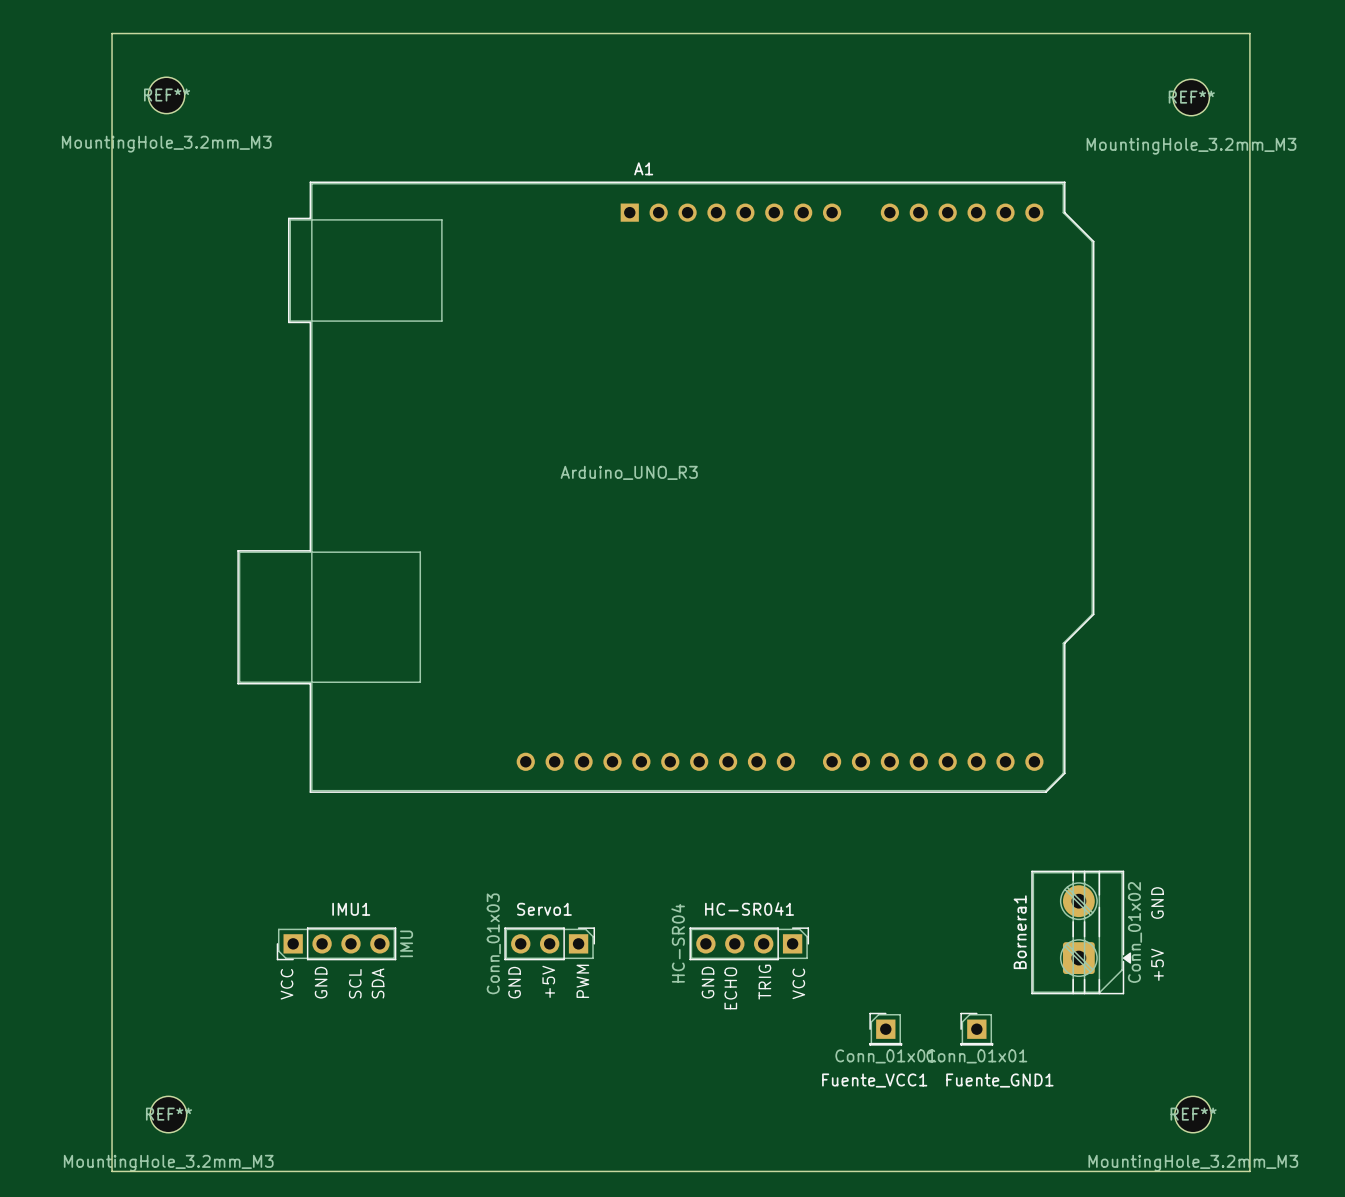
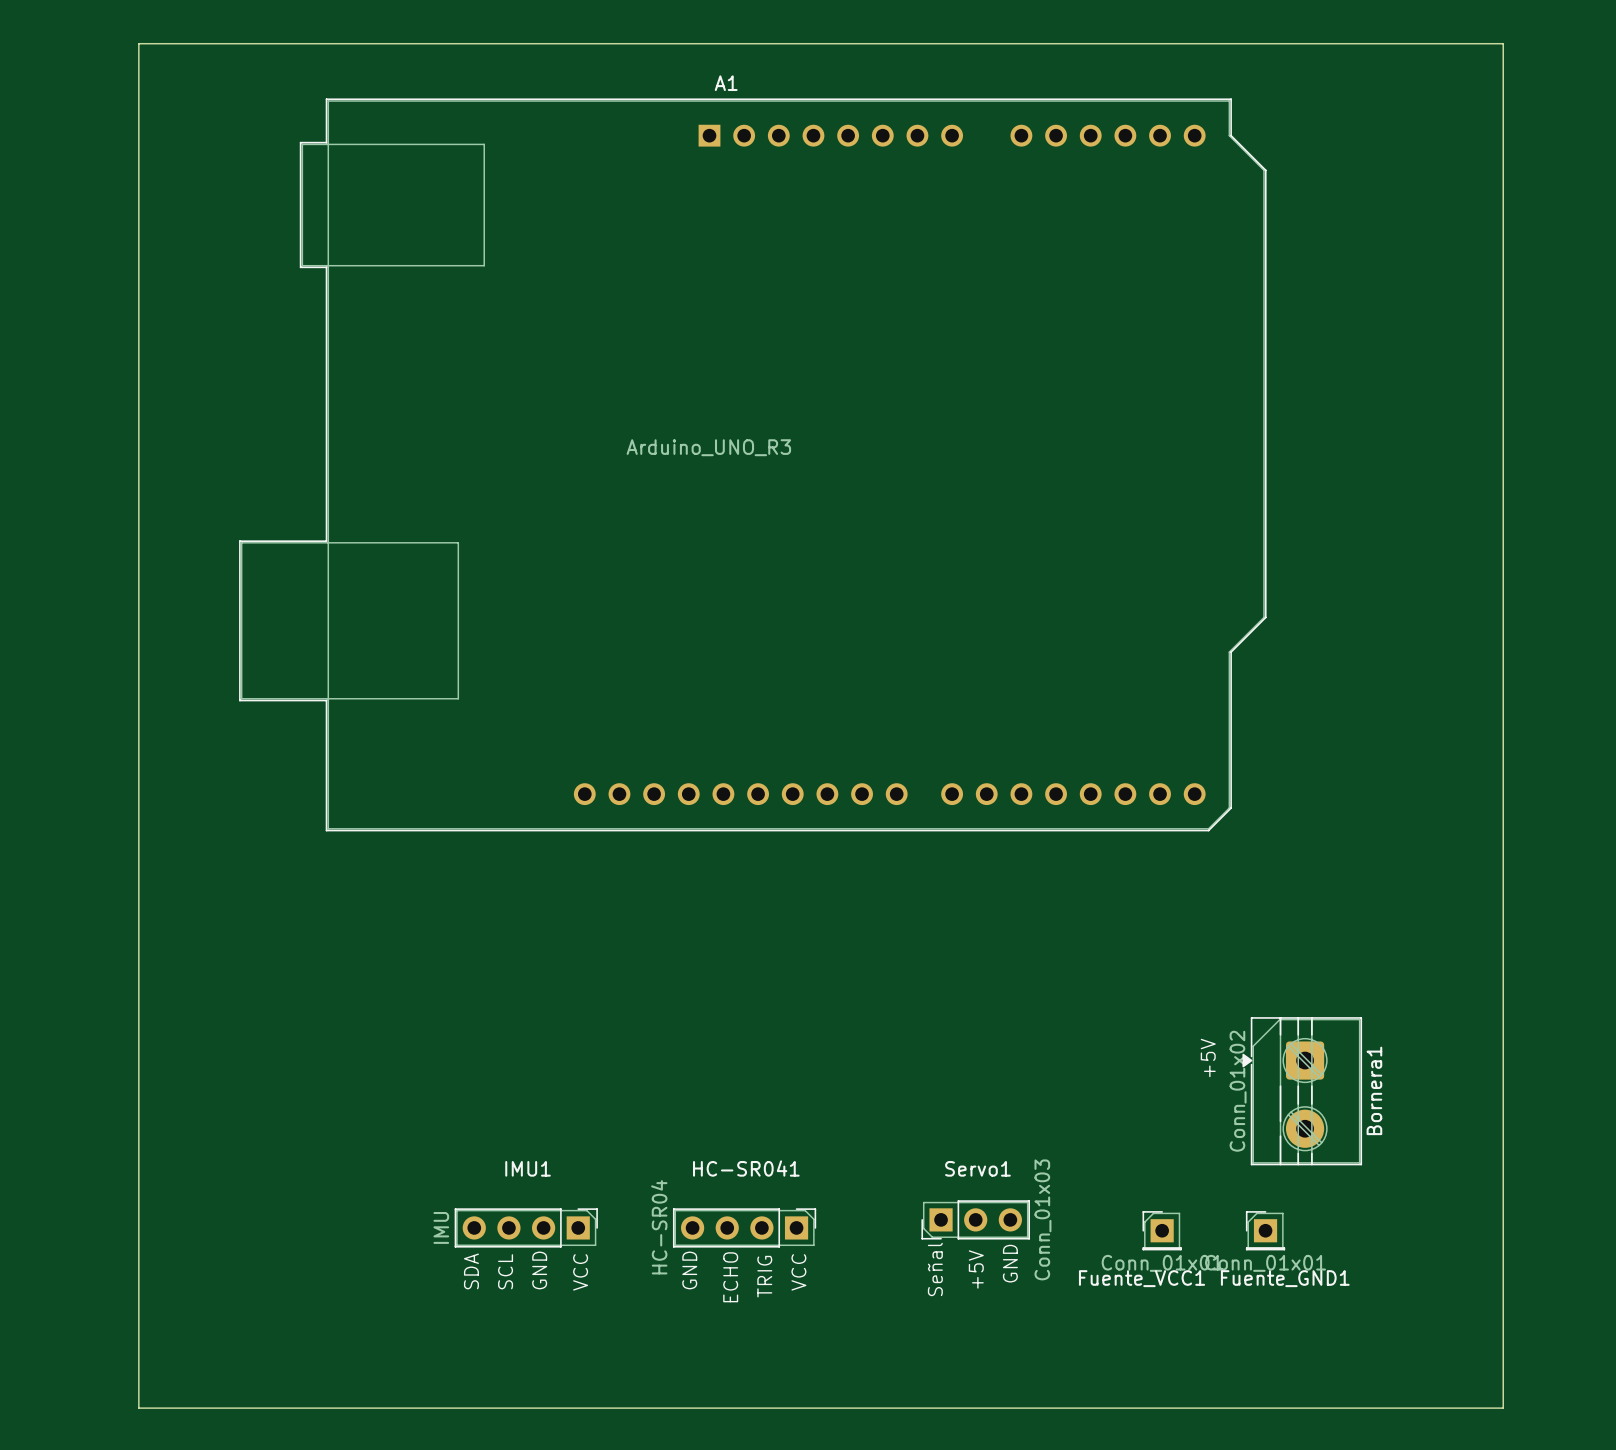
REF**: MountingHole_3.2mm_M3 (166, 95) -> none
REF**: MountingHole_3.2mm_M3 (1191, 97) -> none
A1 position: (665, 487) -> (752, 464)
text: GND (1157, 903) -> none
HC-SR041 name position: HC-SR041 (749, 909) -> HC-SR041 (746, 1168)
Bornera1 rotation: 0° (1081, 932) -> 180° (1302, 1091)
IMU1 rotation: 0° (336, 943) -> 180° (526, 1227)
IMU1 position: (336, 943) -> (526, 1227)
Servo1 rotation: 0° (549, 943) -> 180° (975, 1219)
Servo1 position: (549, 943) -> (975, 1219)
HC-SR041 position: (749, 943) -> (744, 1227)
text position: +5V (1157, 964) -> +5V (1208, 1057)
text: +5V (548, 981) -> none
text: PWM (582, 981) -> none
text: GND (321, 982) -> none
text: GND (514, 982) -> none
text: GND (708, 982) -> none
text position: TRIG (764, 982) -> TRIG (764, 1276)
text position: SCL (355, 983) -> SCL (505, 1271)
text position: SDA (378, 983) -> SDA (471, 1271)
text position: VCC (798, 983) -> VCC (798, 1272)
text: VCC (287, 984) -> none
text position: ECHO (730, 988) -> ECHO (730, 1277)
Fuente_VCC1 position: (885, 1029) -> (1162, 1230)
Fuente_GND1 position: (976, 1029) -> (1265, 1230)
text: none -> GND (1010, 1263)
text: none -> Señal (935, 1269)
text: none -> +5V (976, 1269)
text: none -> GND (539, 1270)
text: none -> GND (689, 1270)
text: none -> VCC (580, 1272)
Fuente_VCC1 name position: Fuente_VCC1 (874, 1080) -> Fuente_VCC1 (1142, 1278)
Fuente_GND1 name position: Fuente_GND1 (999, 1080) -> Fuente_GND1 (1285, 1278)
REF**: MountingHole_3.2mm_M3 (168, 1114) -> none
REF**: MountingHole_3.2mm_M3 (1193, 1114) -> none

